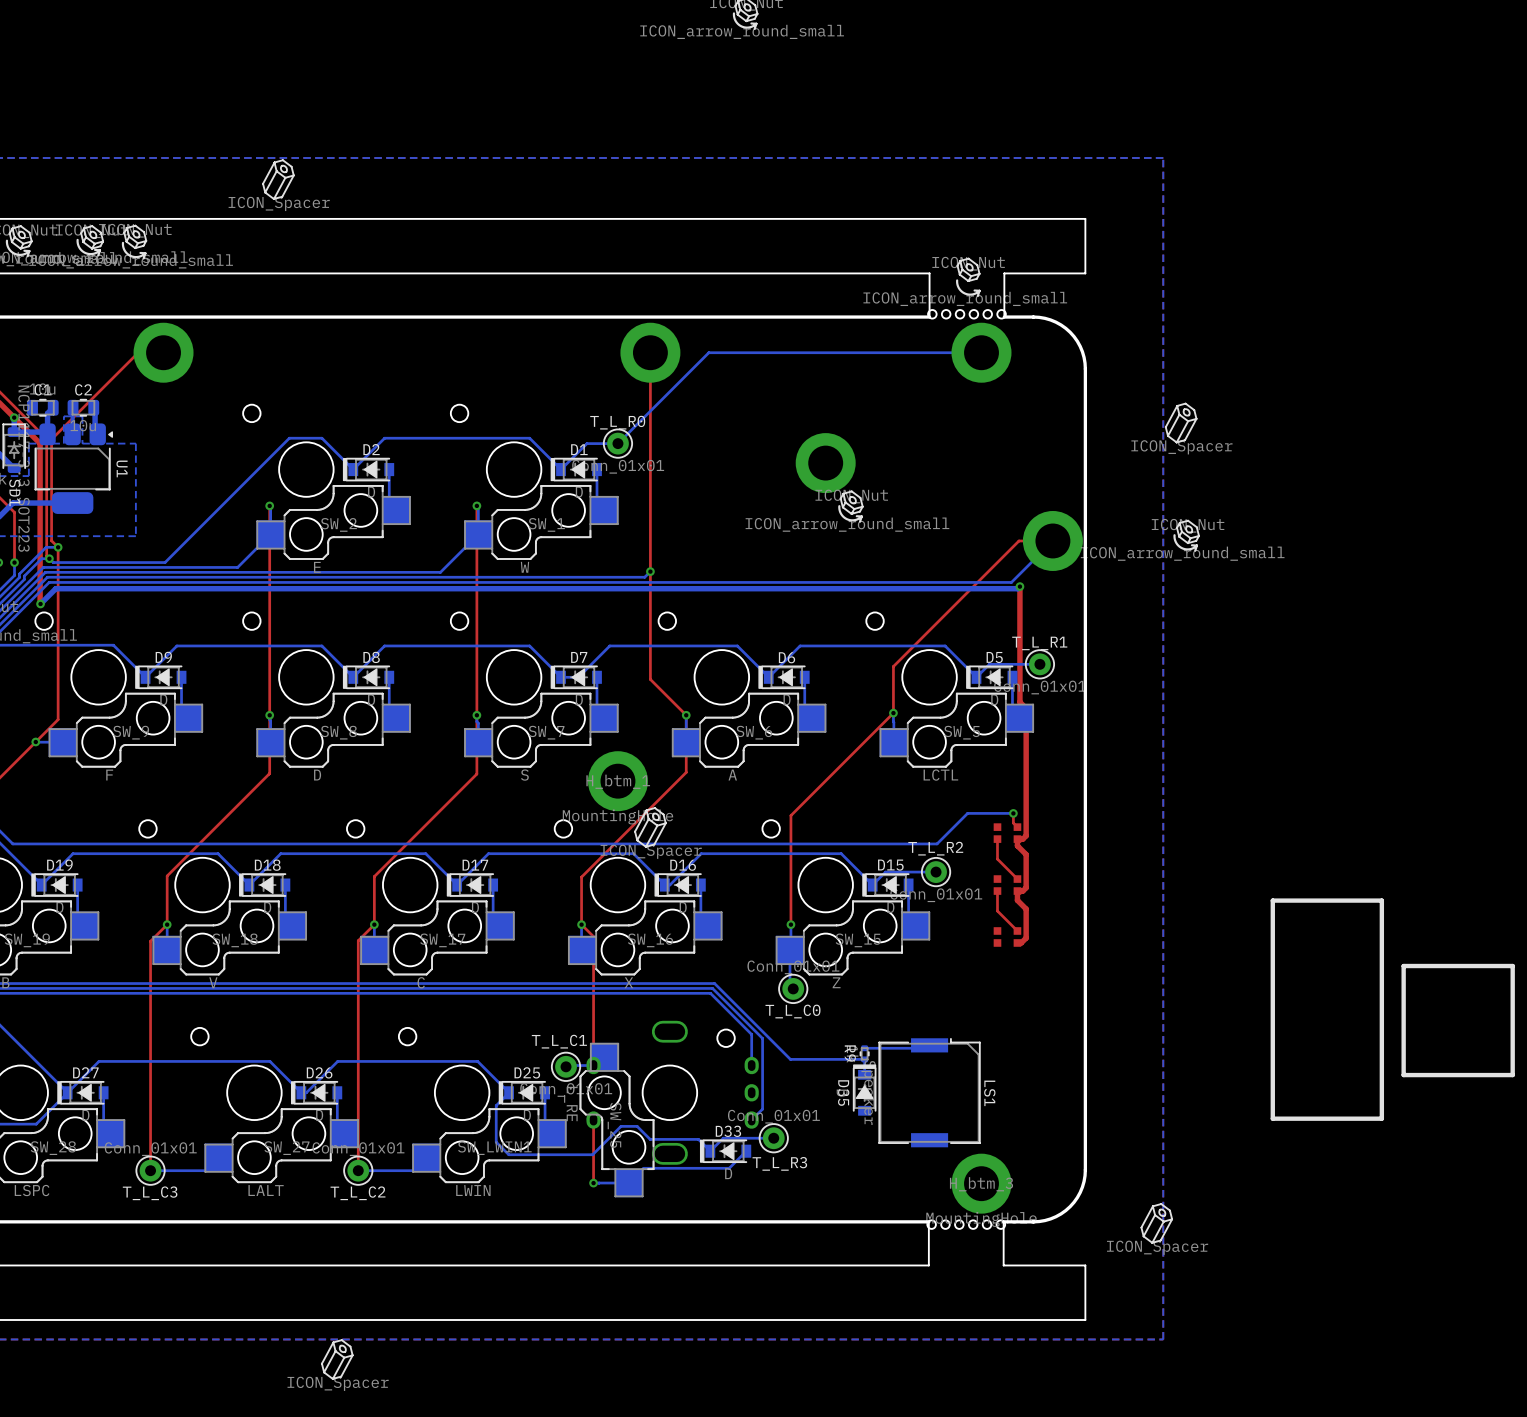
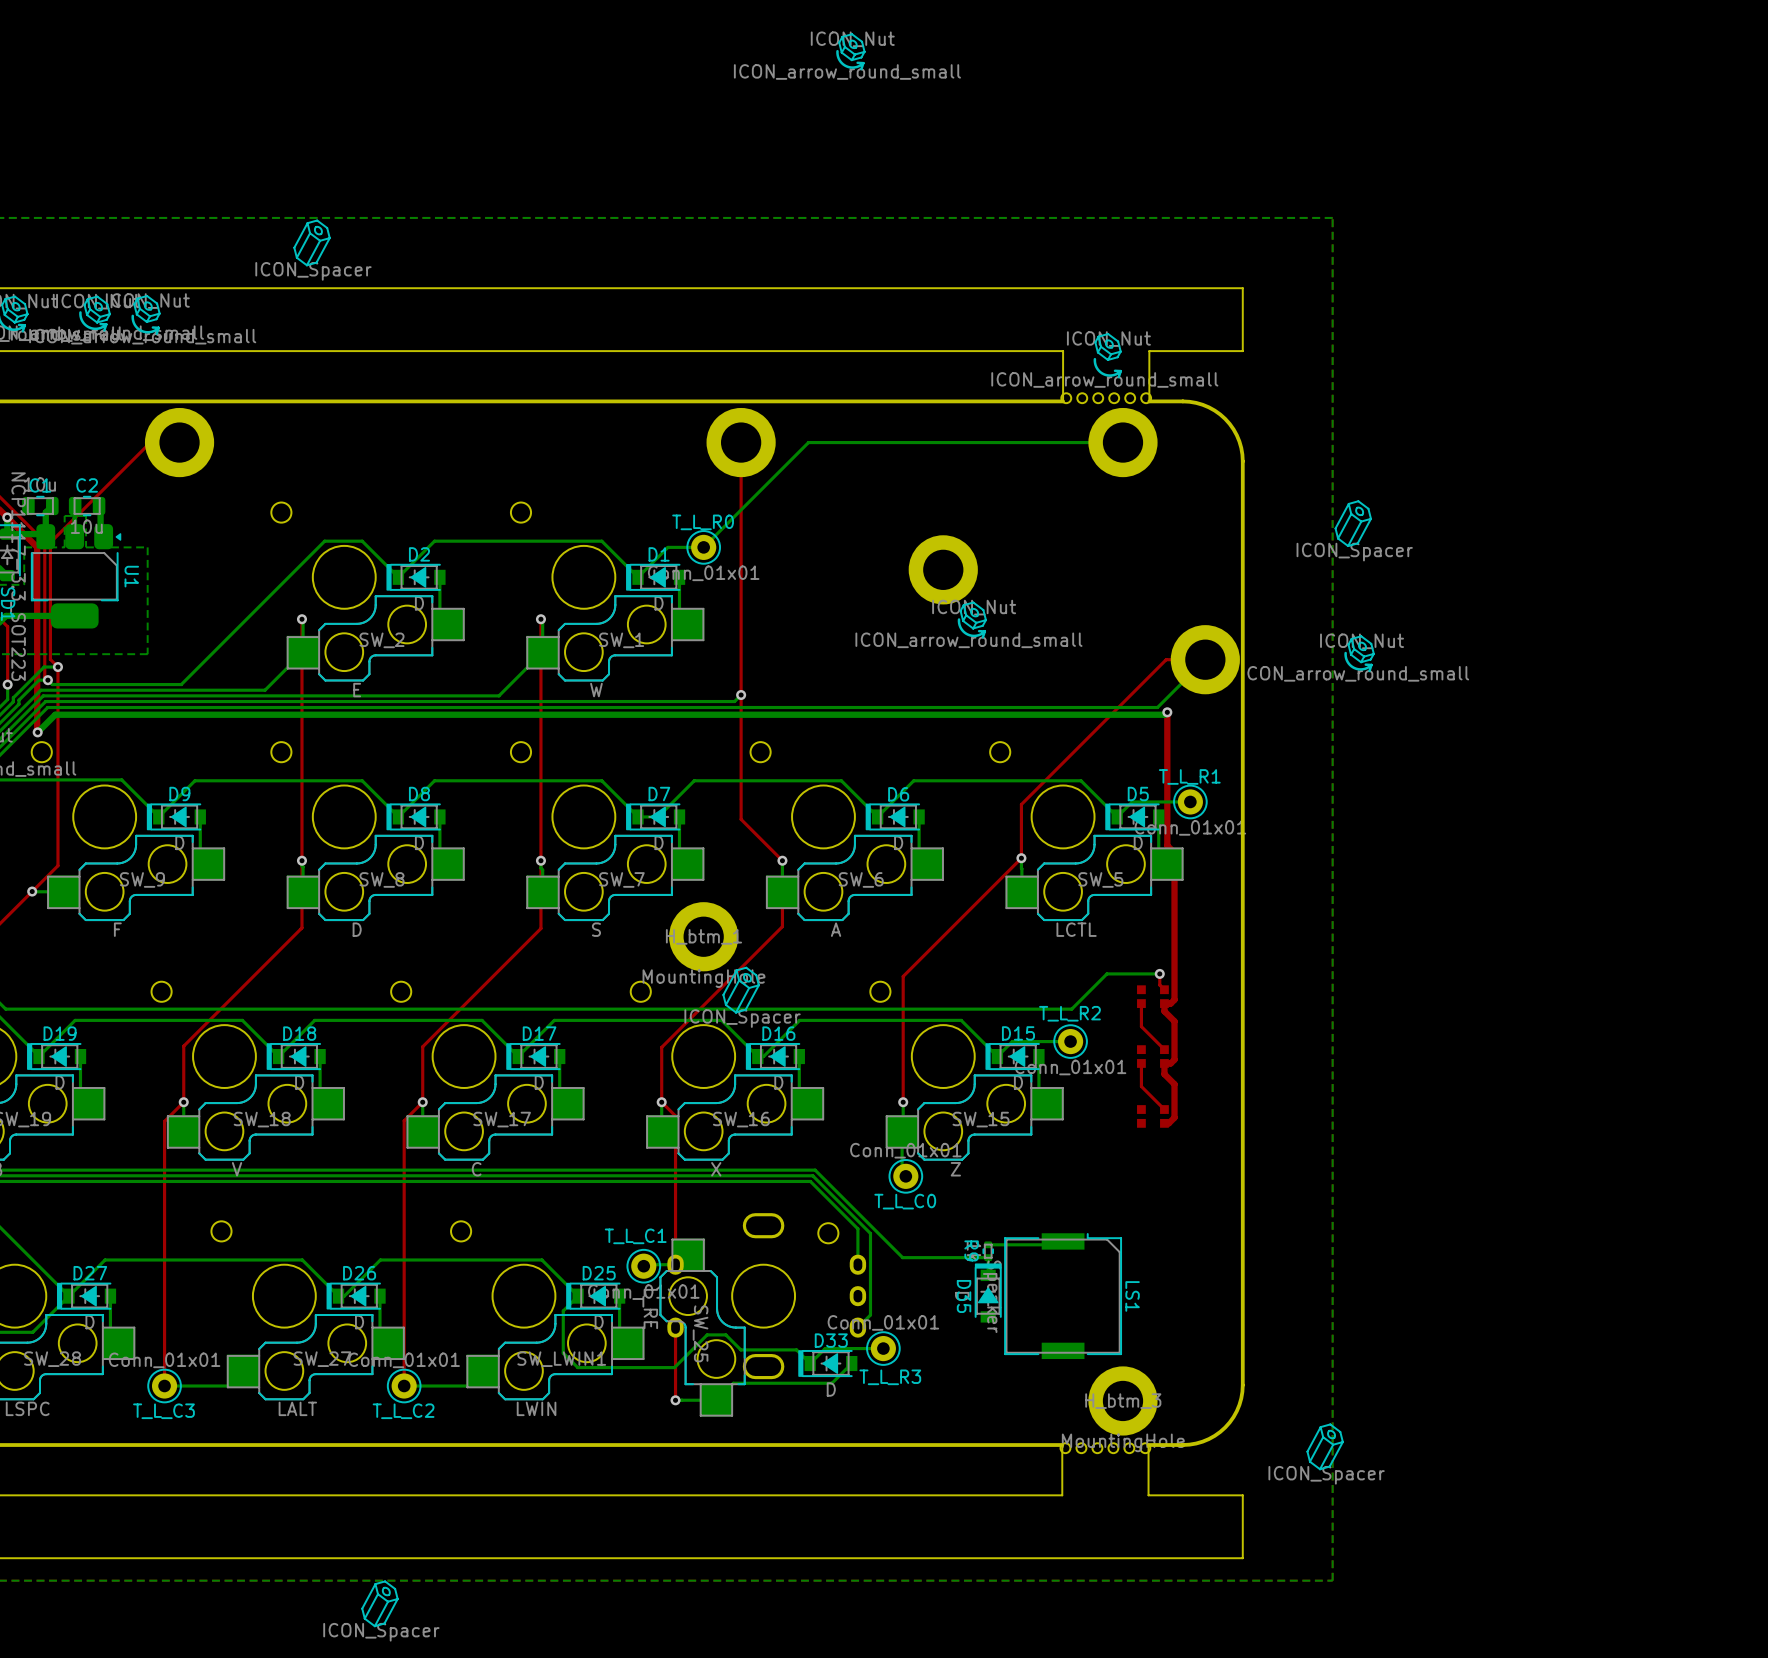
line: (1381, 900) (1272, 900) (1272, 1118) (1381, 1118) (1381, 900) -> none
line: (1512, 966) (1403, 966) (1403, 1075) (1512, 1075) (1512, 966) -> none

